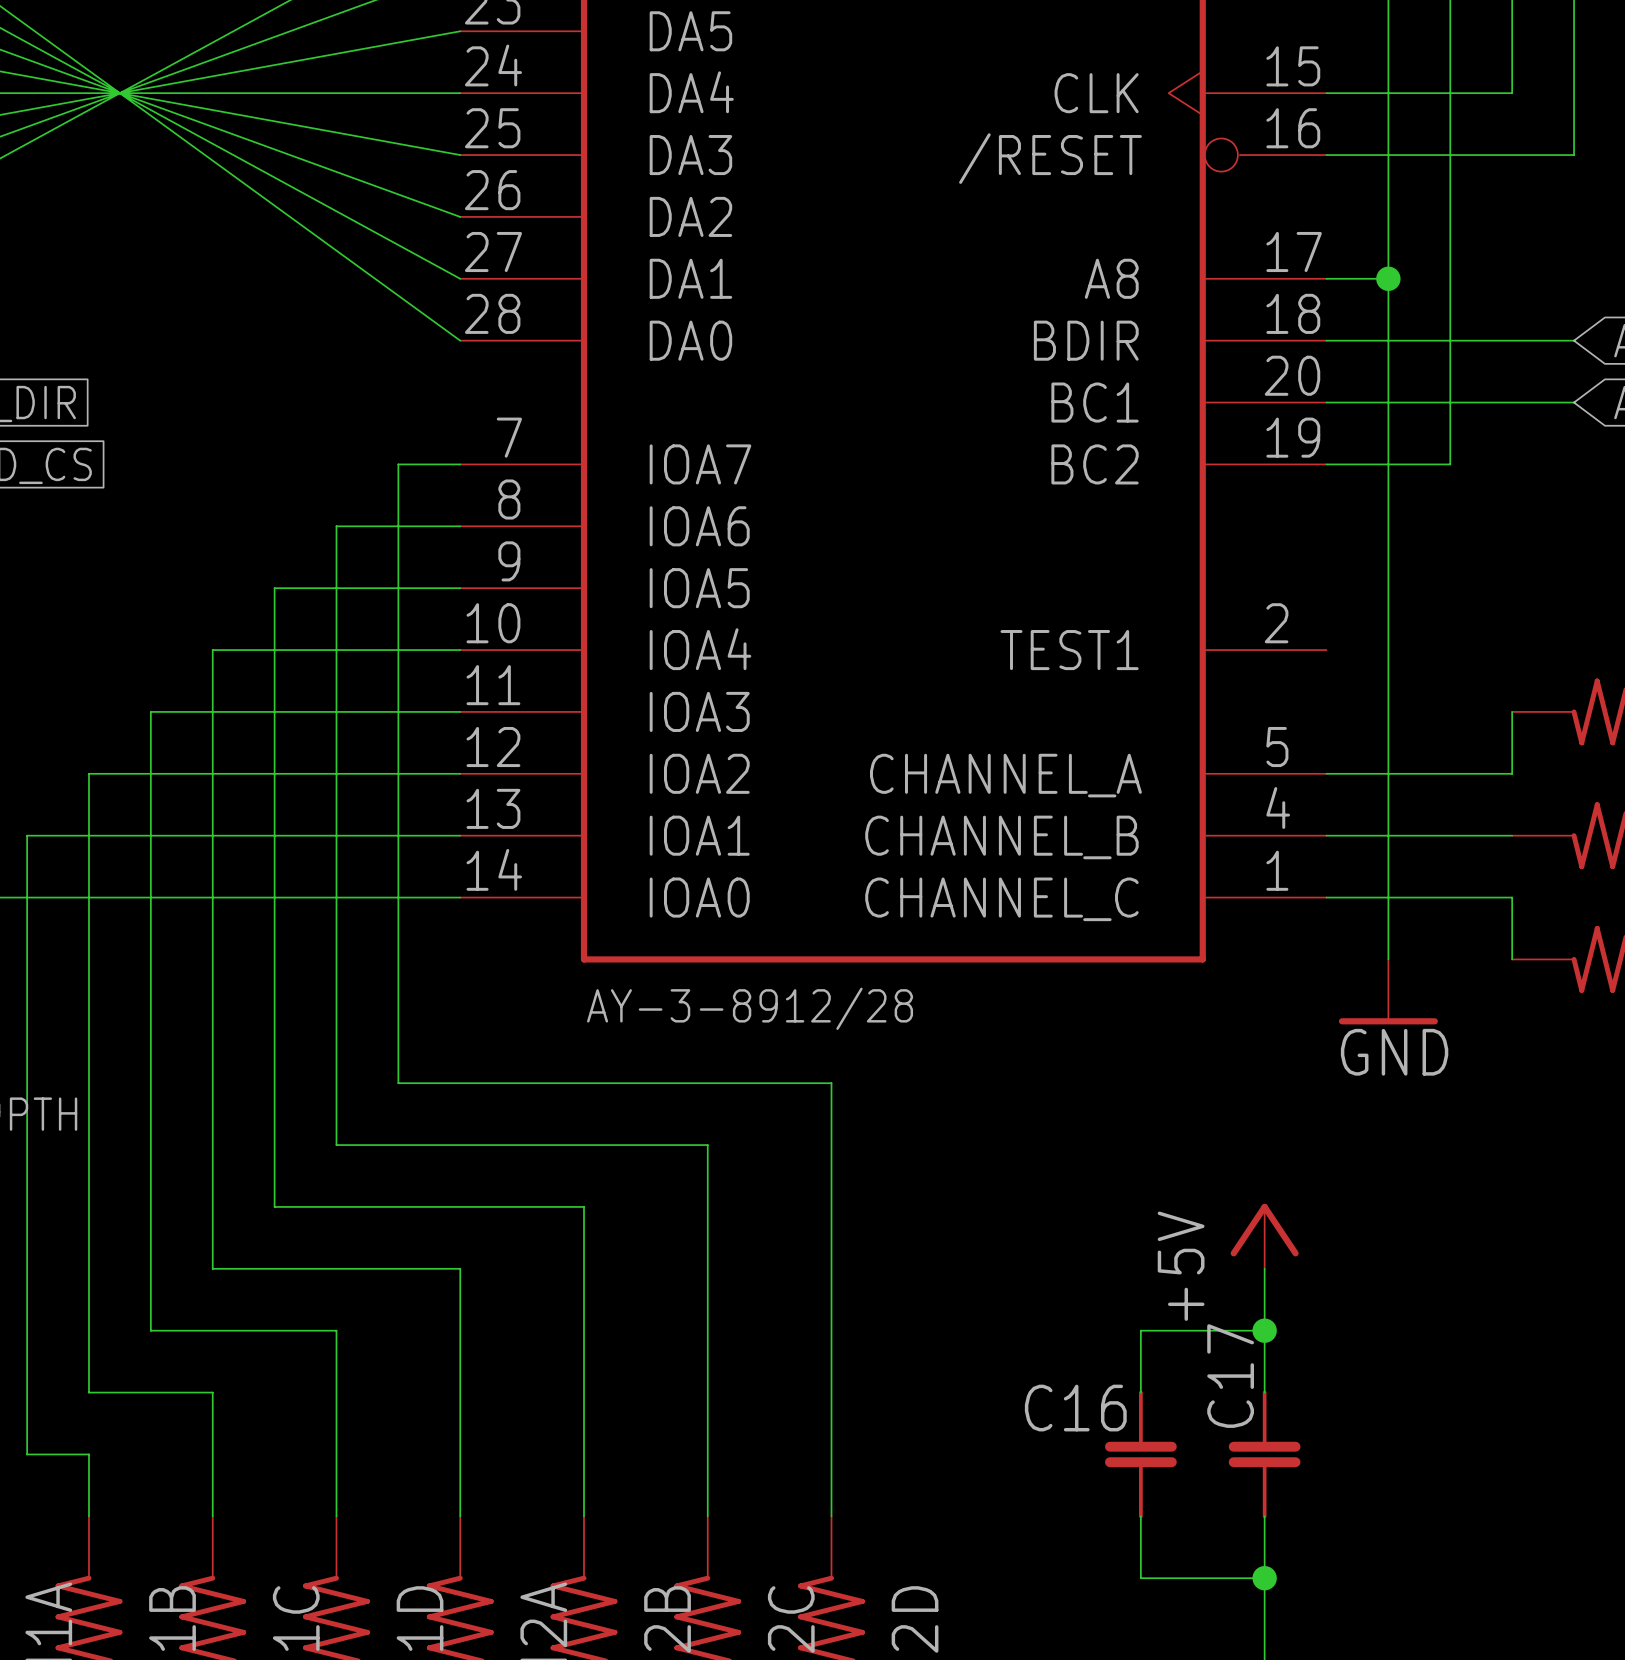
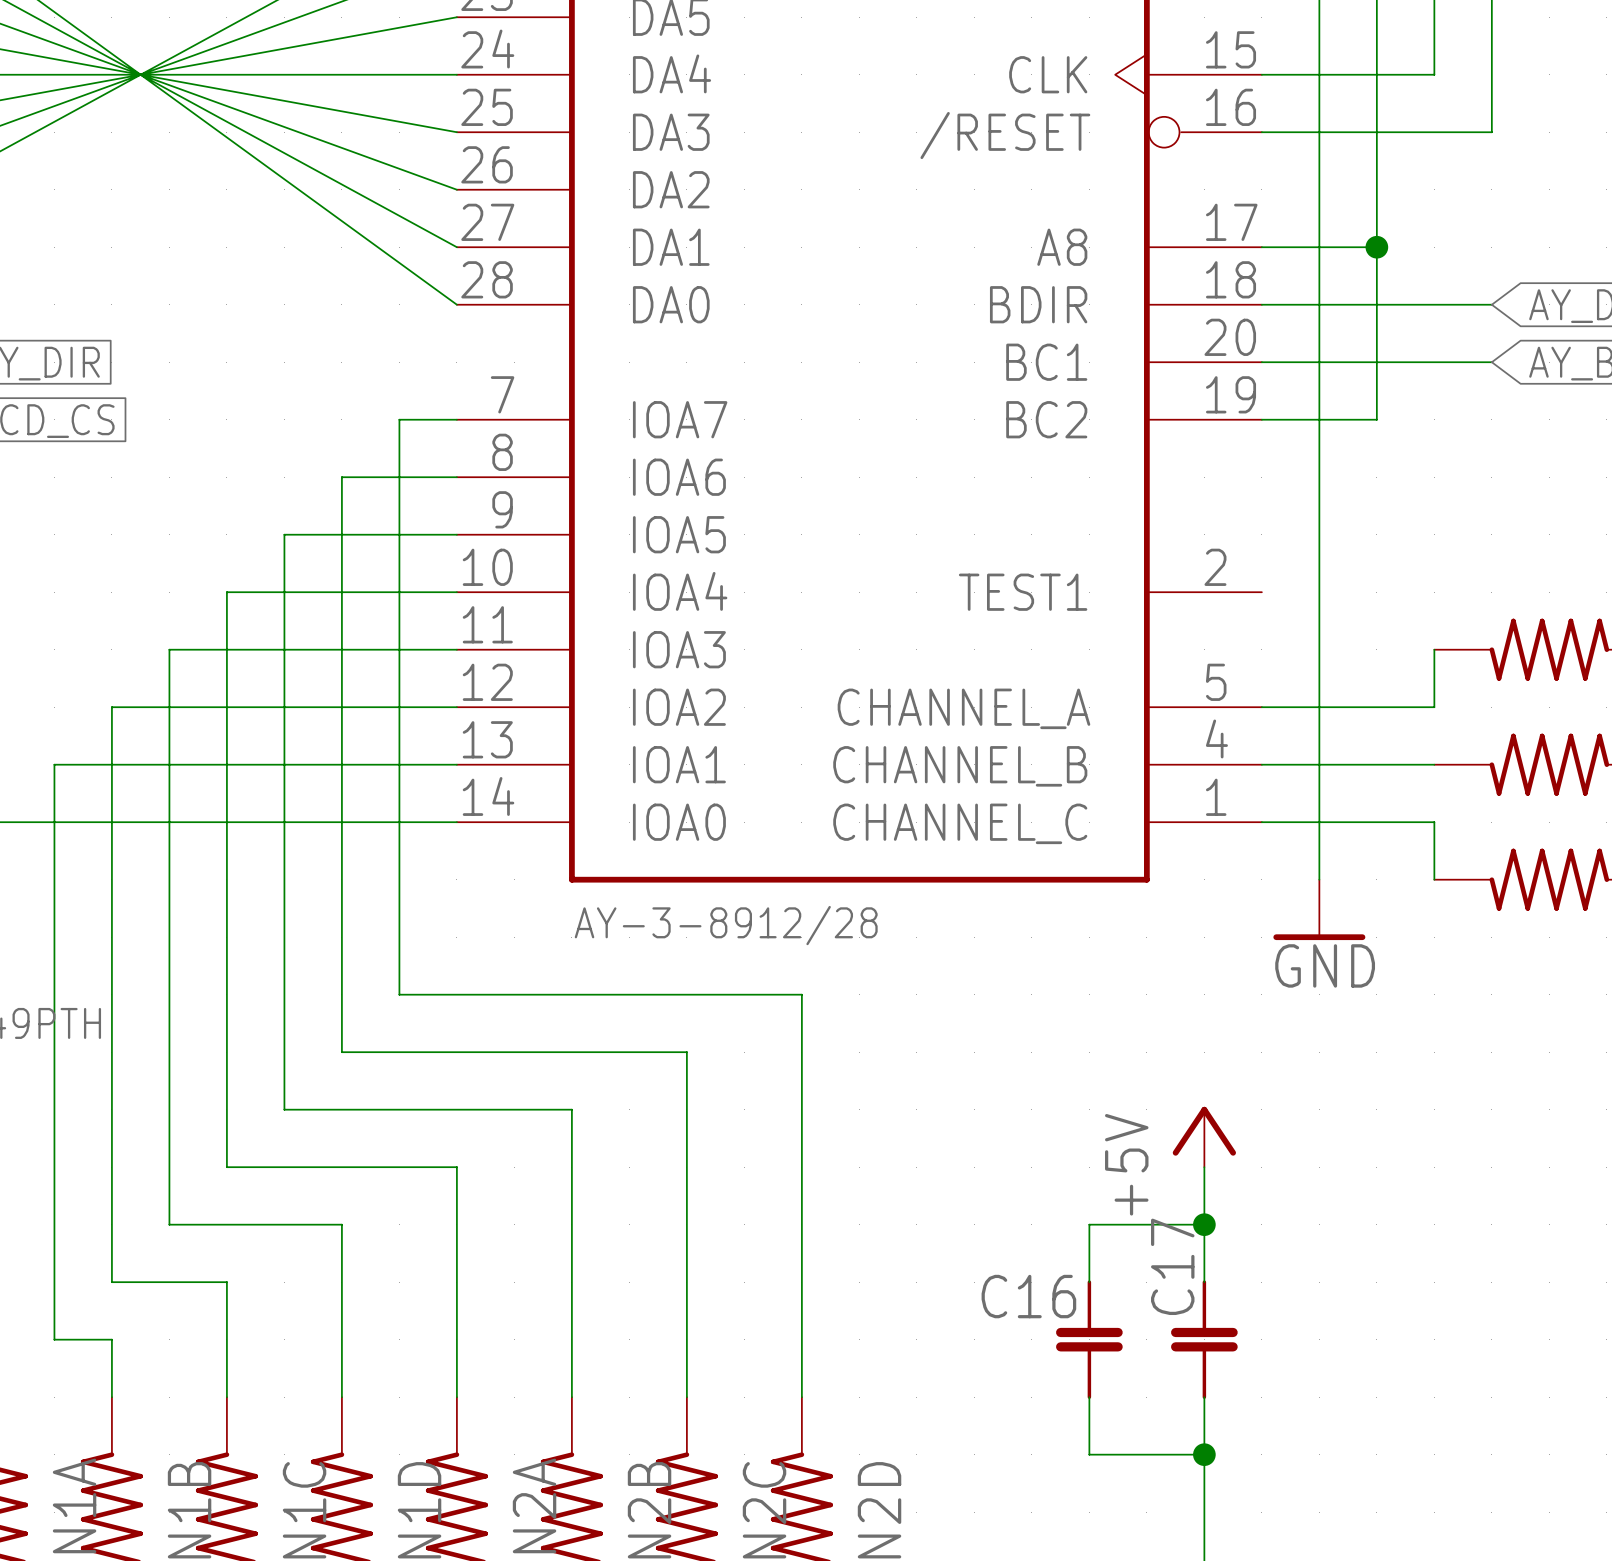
wire: none -> (1319, 247) (1376, 247)
junction position: (1388, 278) -> (1376, 247)

